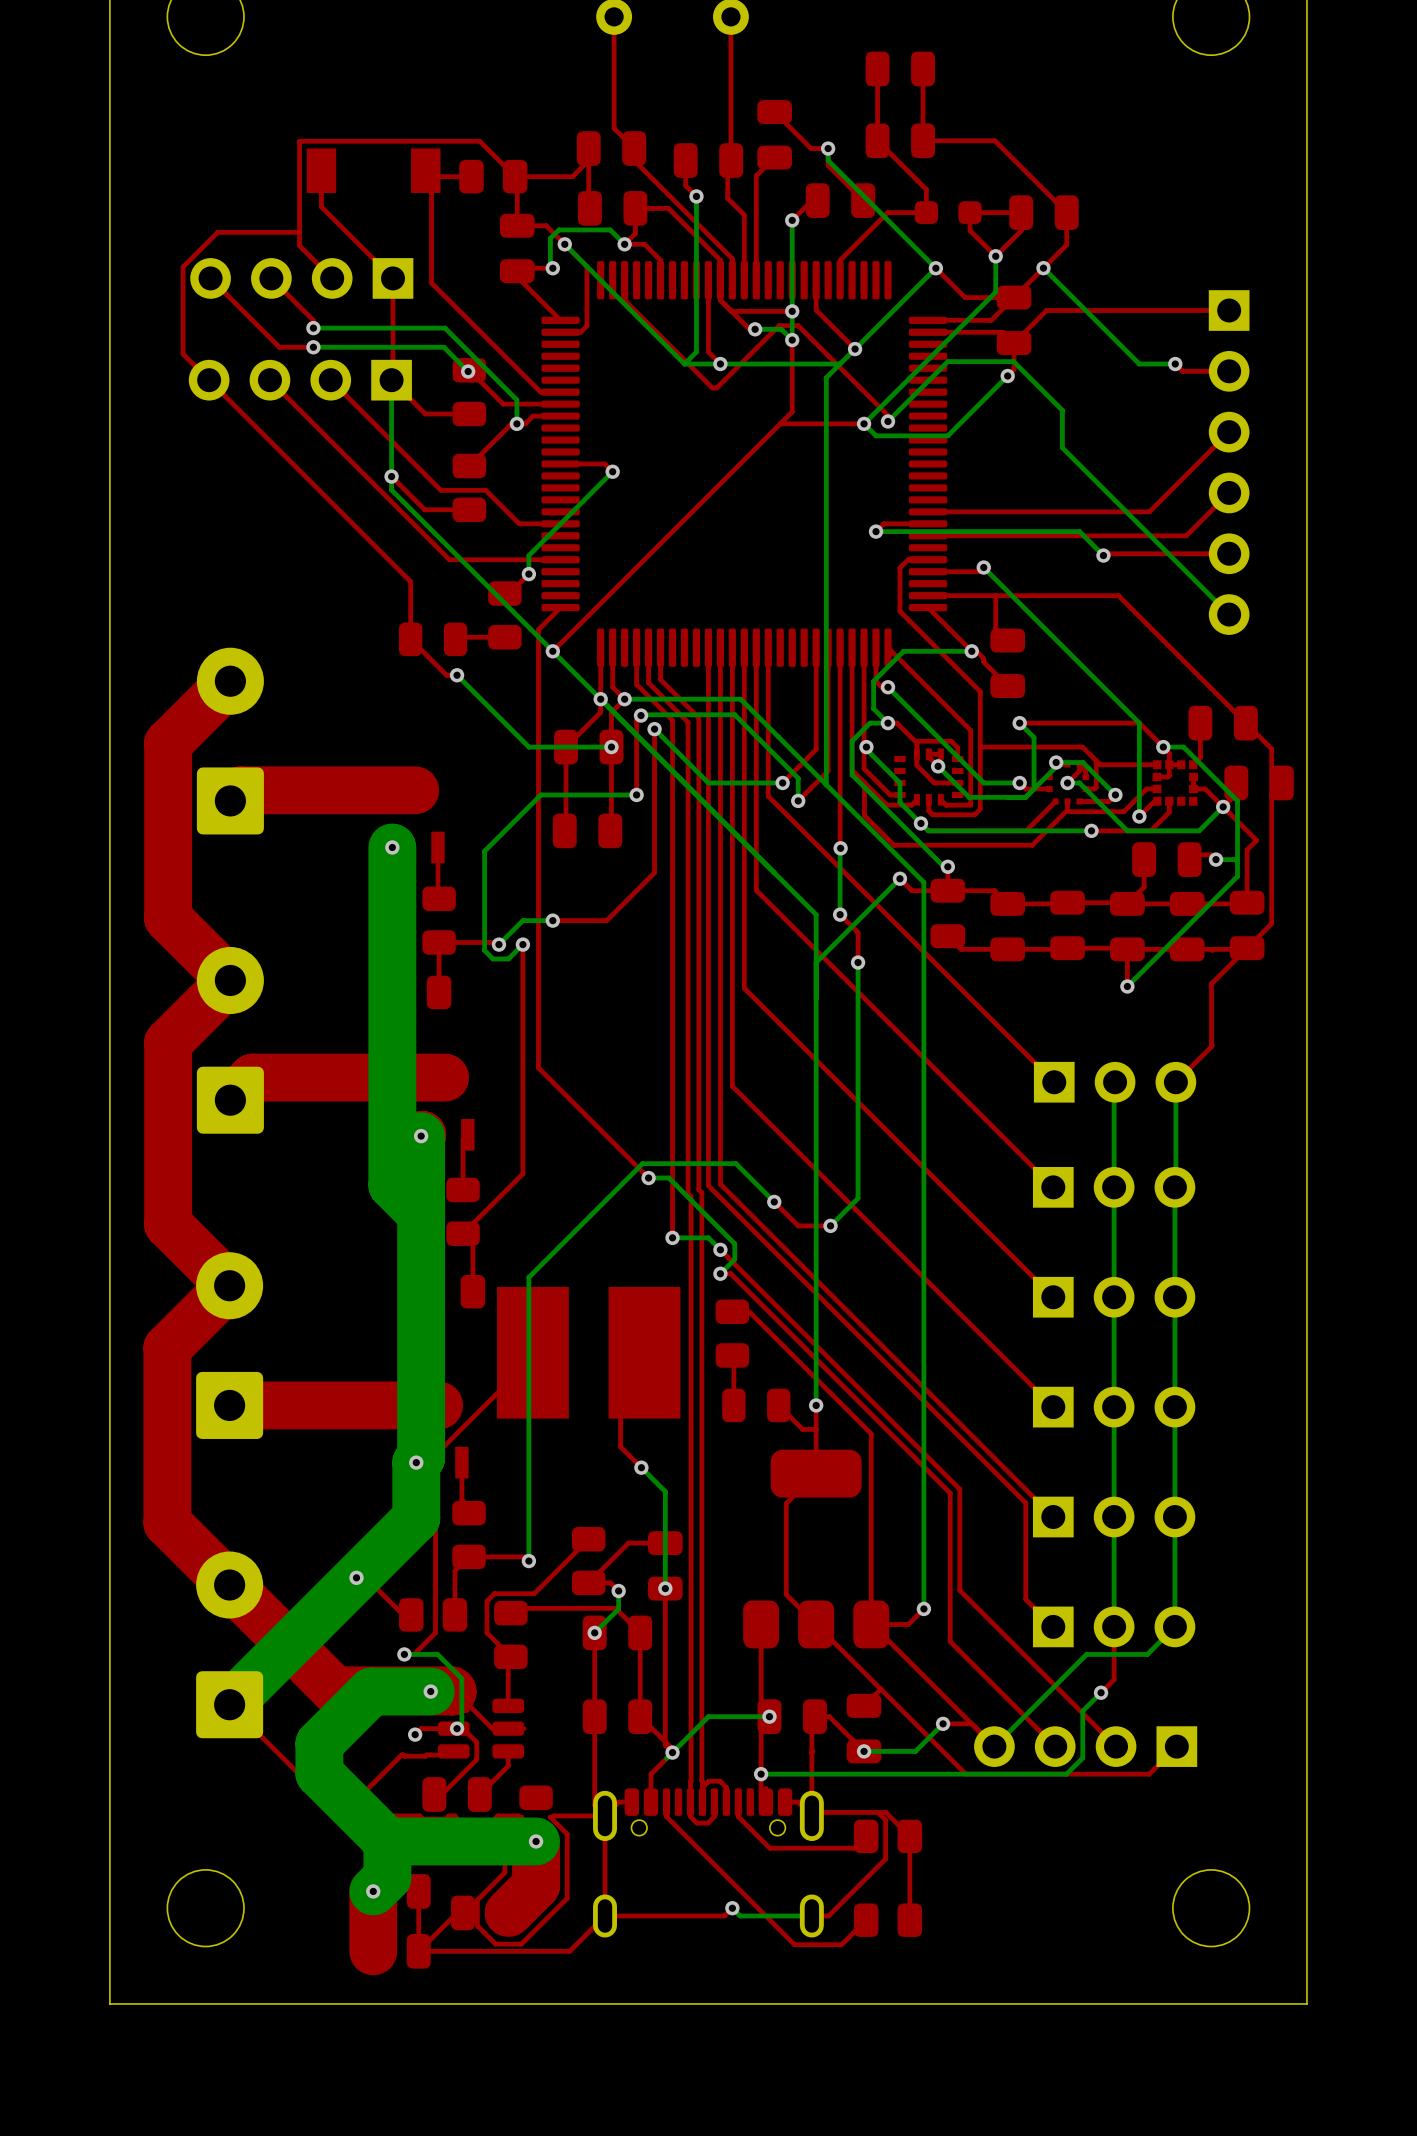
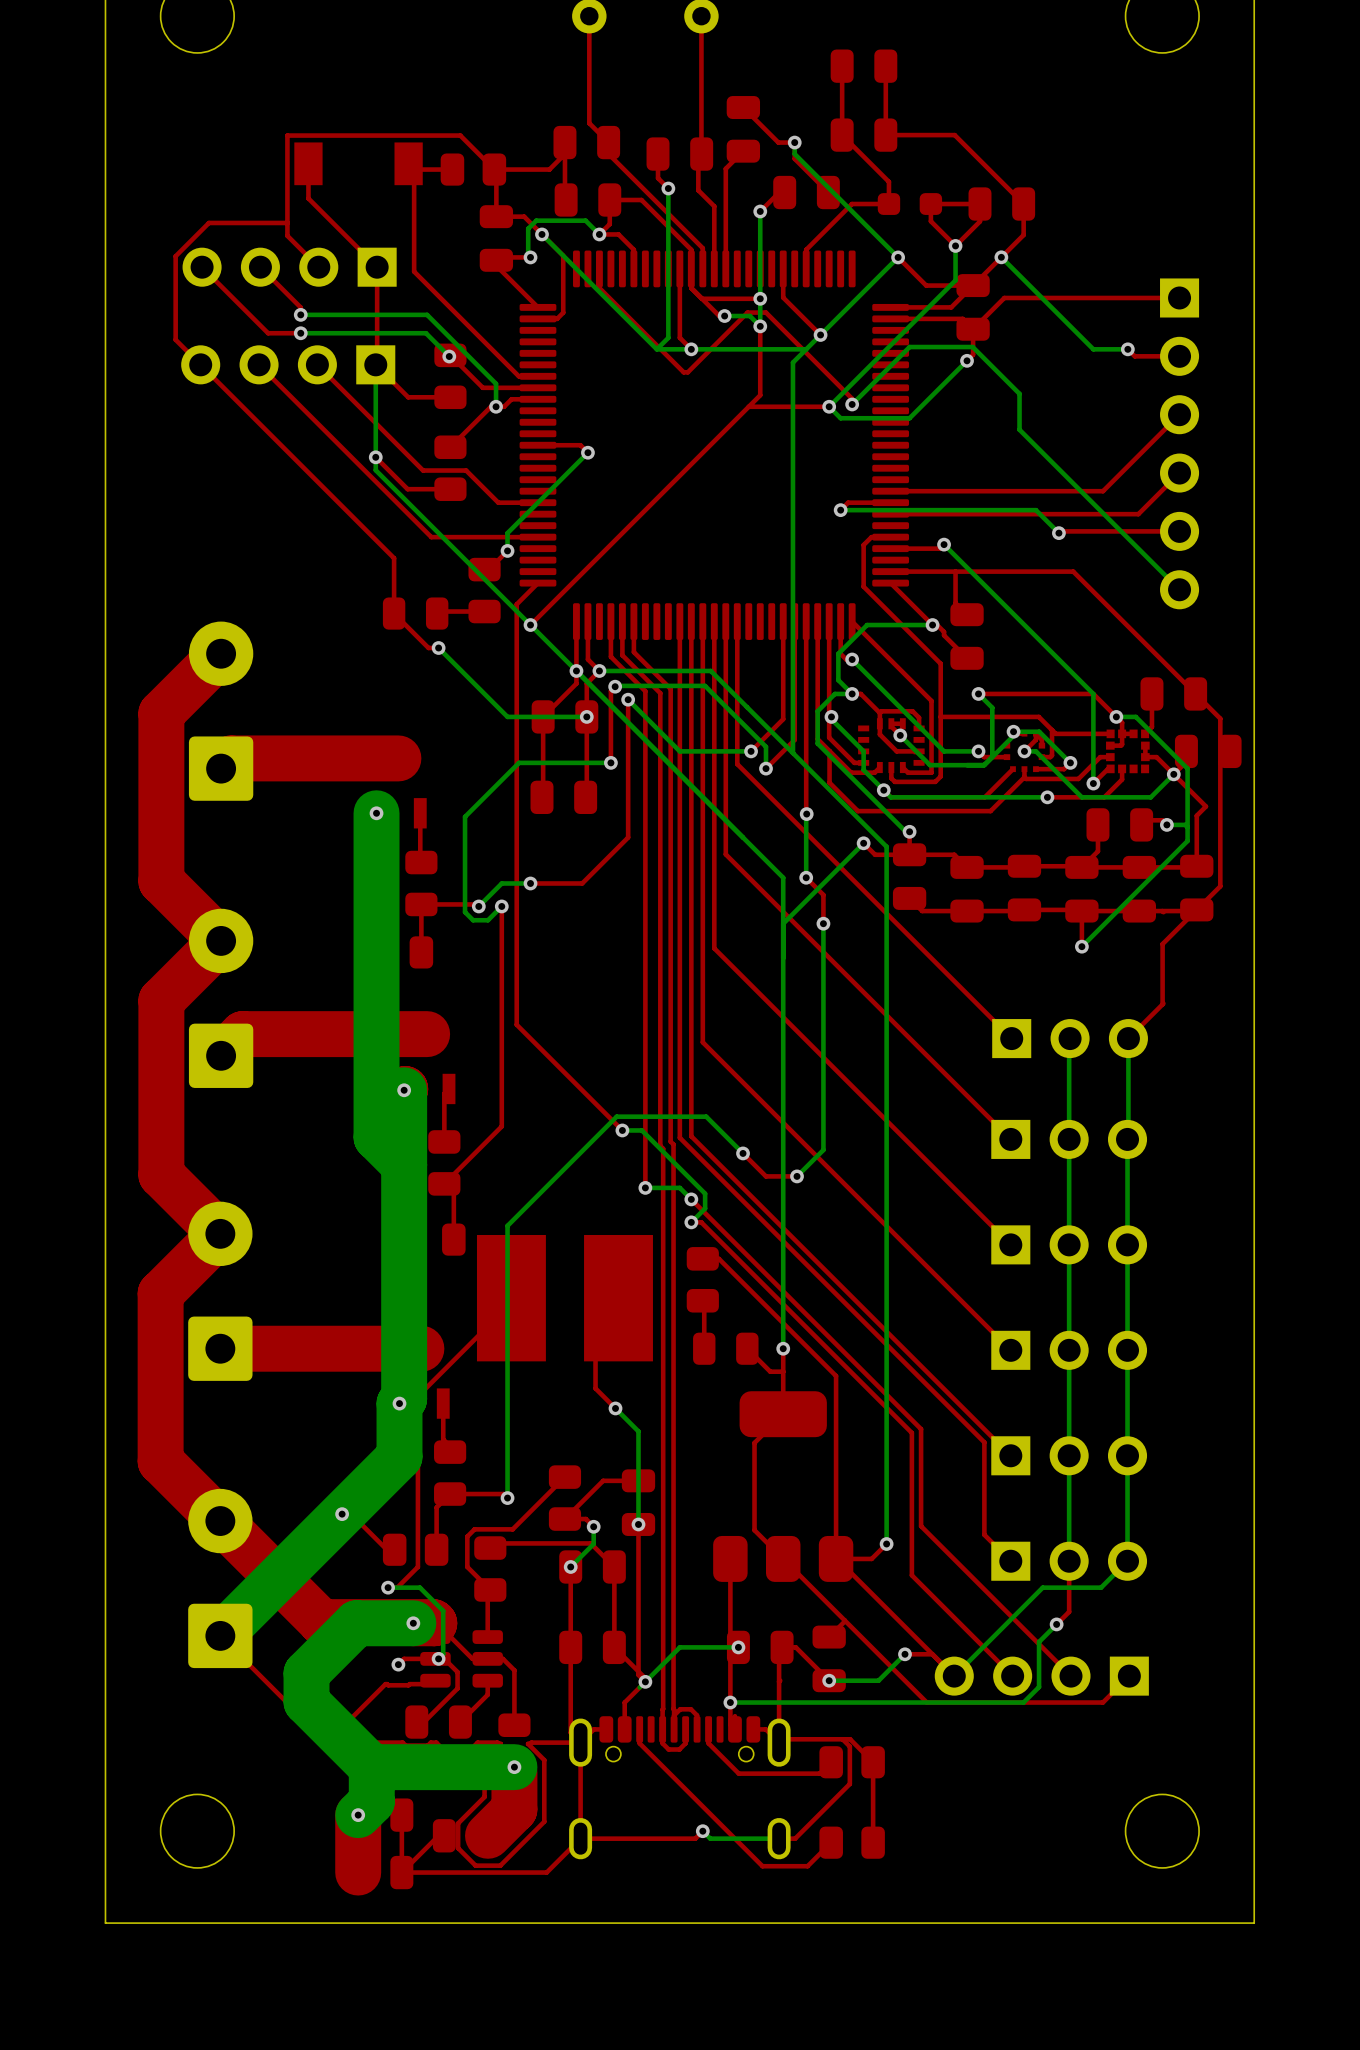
top track: none -> (502, 1658) (514, 1670) (514, 1725)

